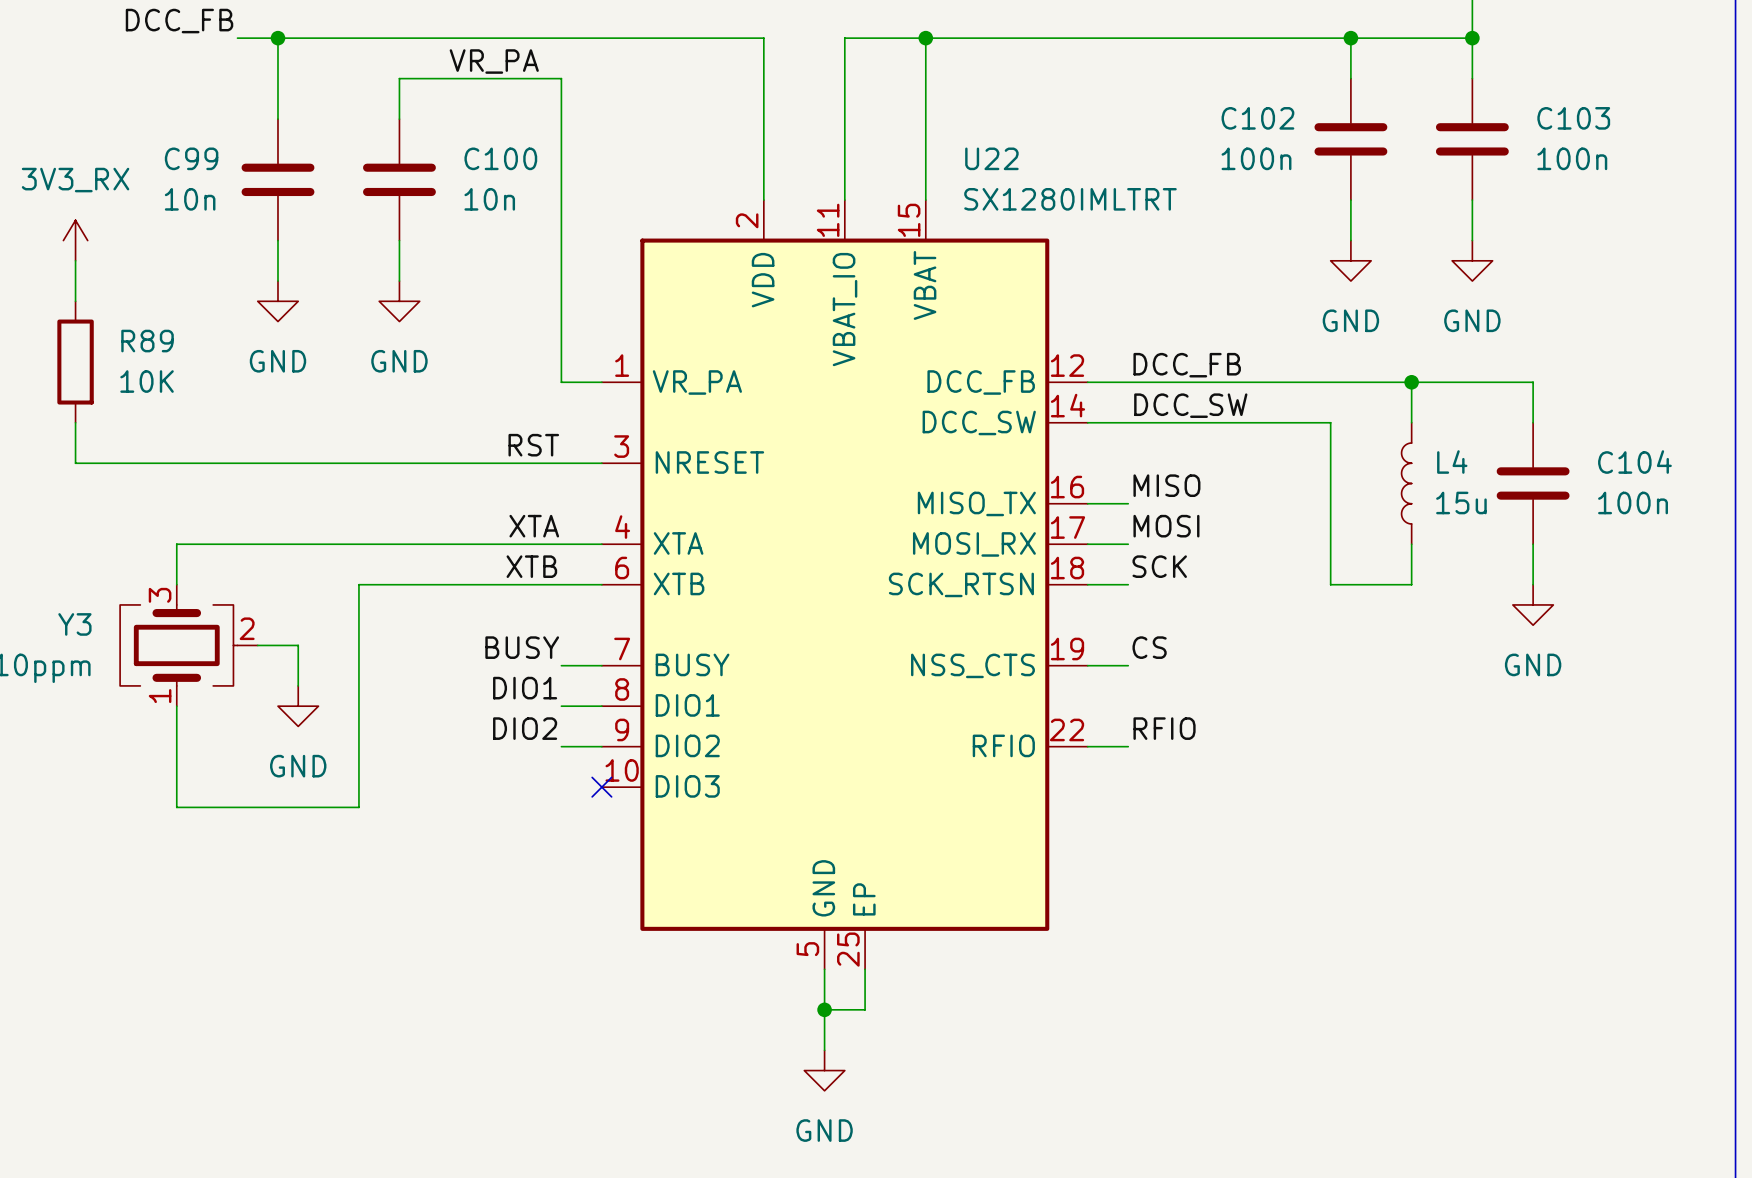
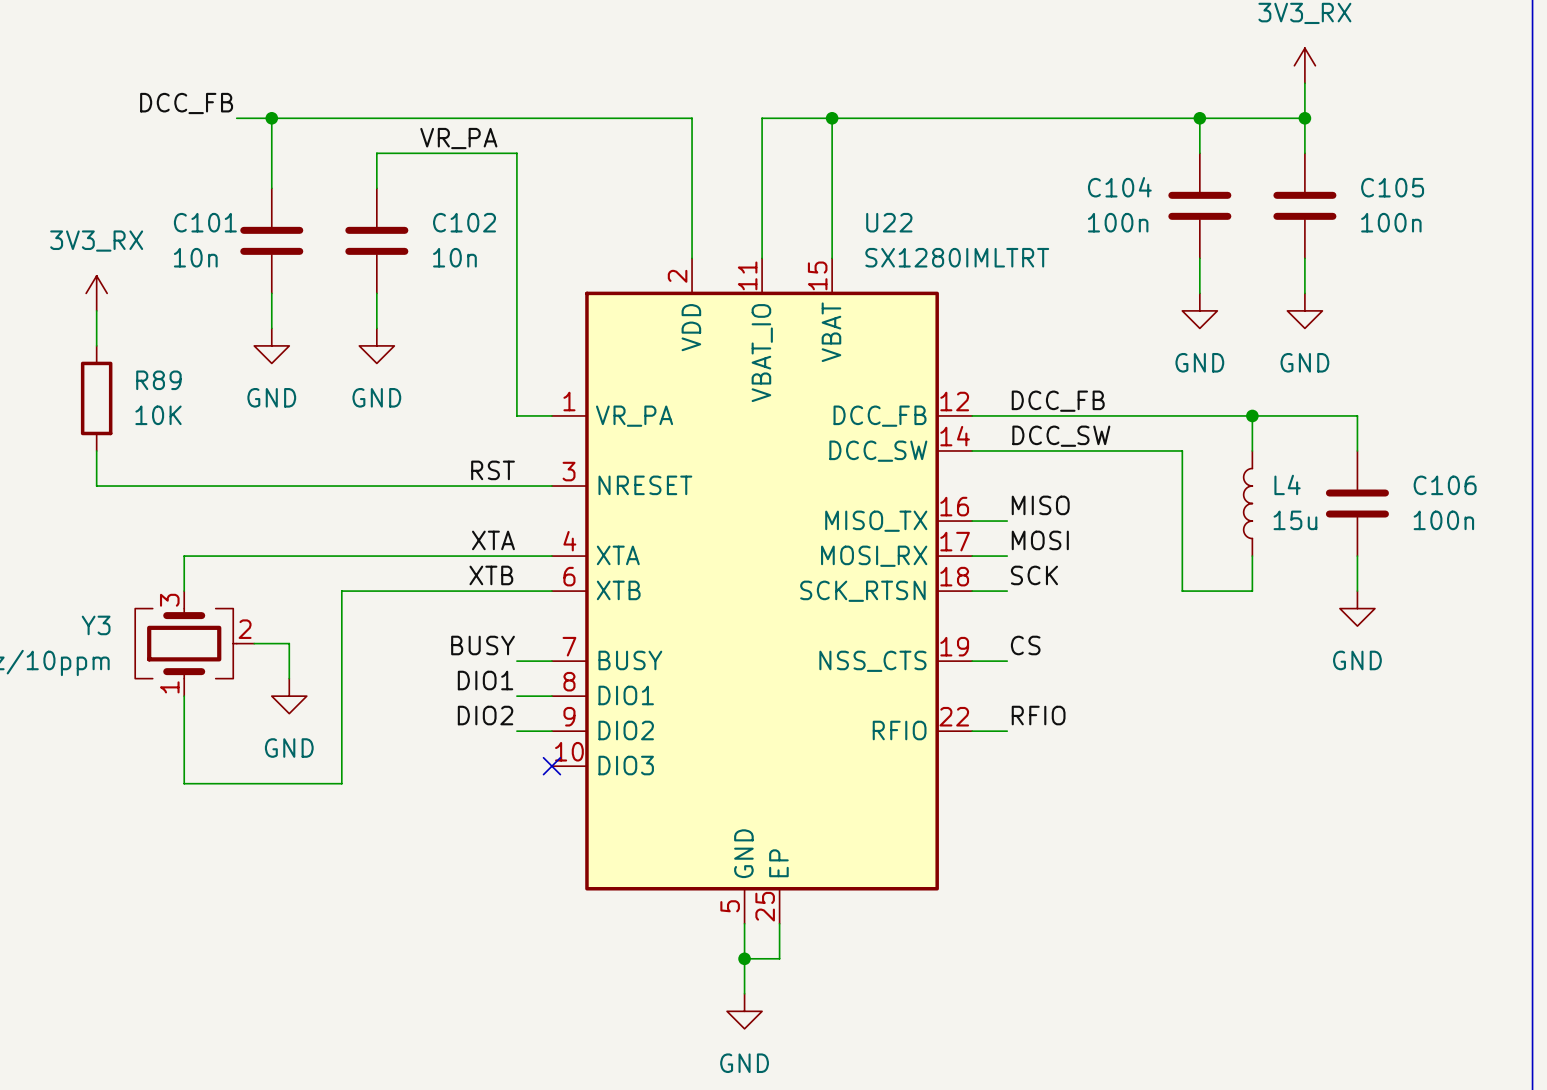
C102 name: C102 (1257, 118) -> C104 (1119, 187)
C103 name: C103 (1573, 118) -> C105 (1392, 187)
C99 name: C99 (191, 158) -> C101 (205, 222)
C100 name: C100 (500, 158) -> C102 (464, 222)
C104 name: C104 (1634, 462) -> C106 (1445, 485)

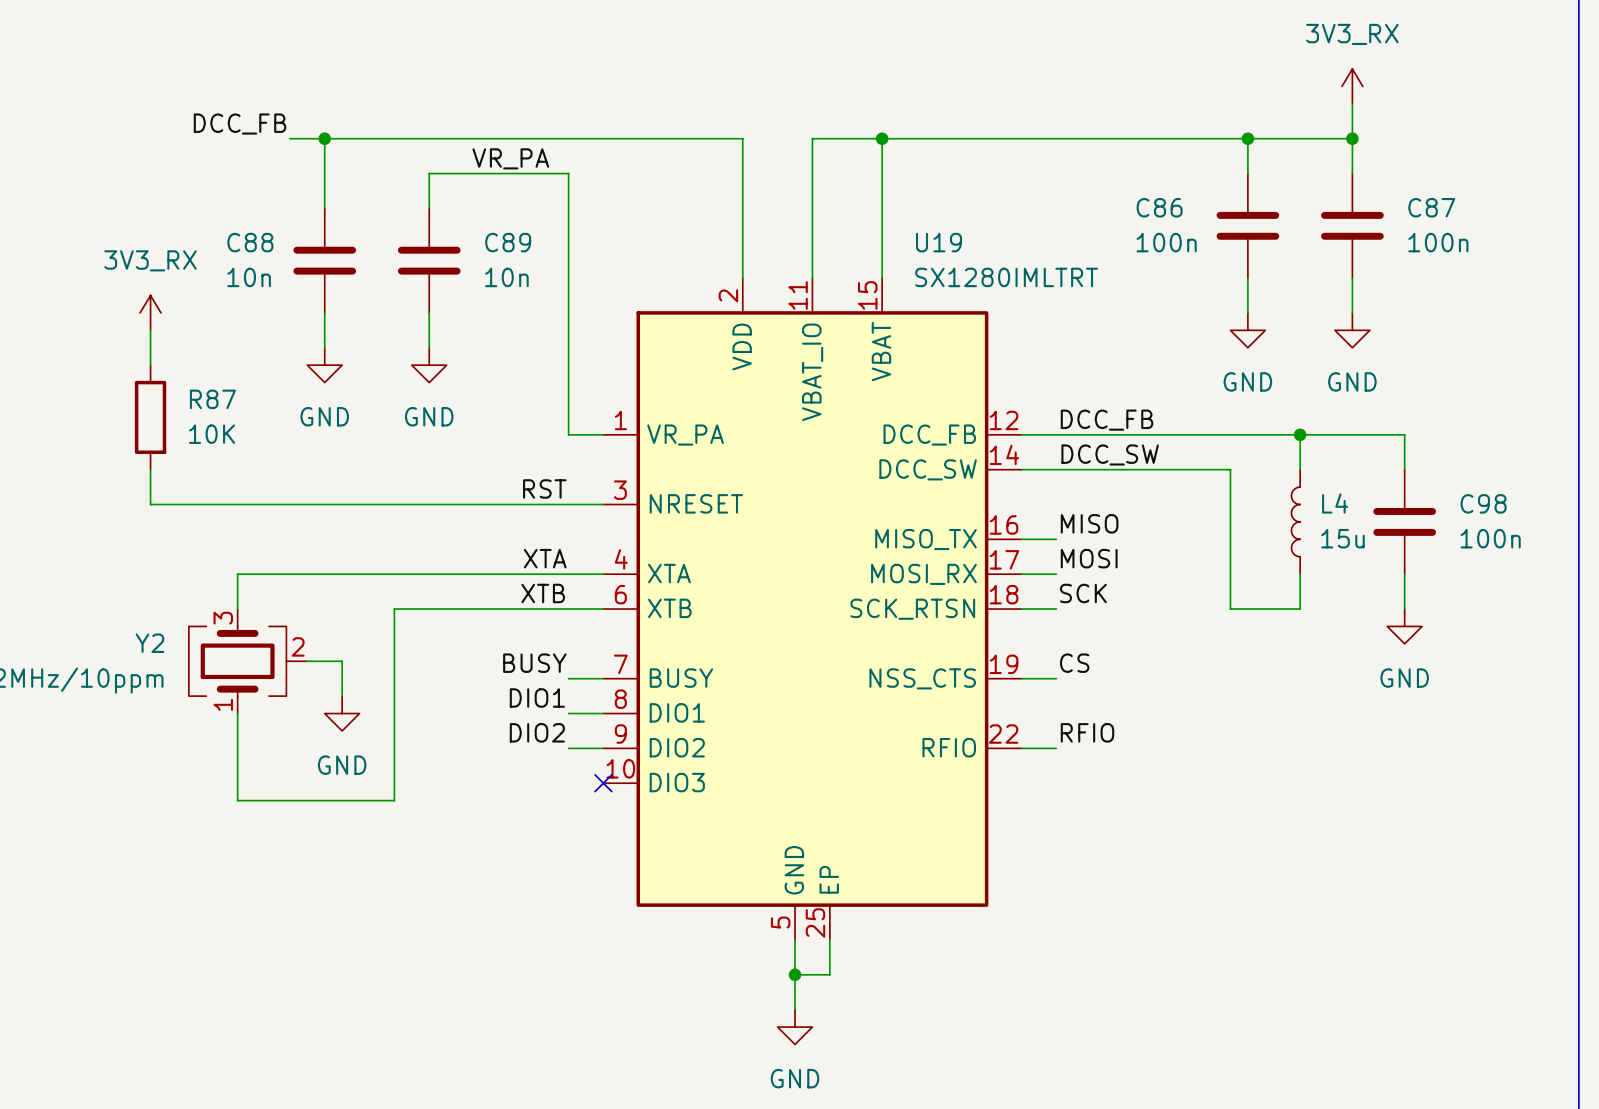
C104 name: C104 (1119, 187) -> C86 (1159, 207)
C105 name: C105 (1392, 187) -> C87 (1431, 207)
C101 name: C101 (205, 222) -> C88 (250, 242)
C102 name: C102 (464, 222) -> C89 (508, 242)
U22 name: U22 (889, 222) -> U19 (939, 242)
R89 name: R89 (158, 380) -> R87 (212, 399)
C106 name: C106 (1445, 485) -> C98 (1483, 503)
Y3 name: Y3 (96, 625) -> Y2 (150, 643)

